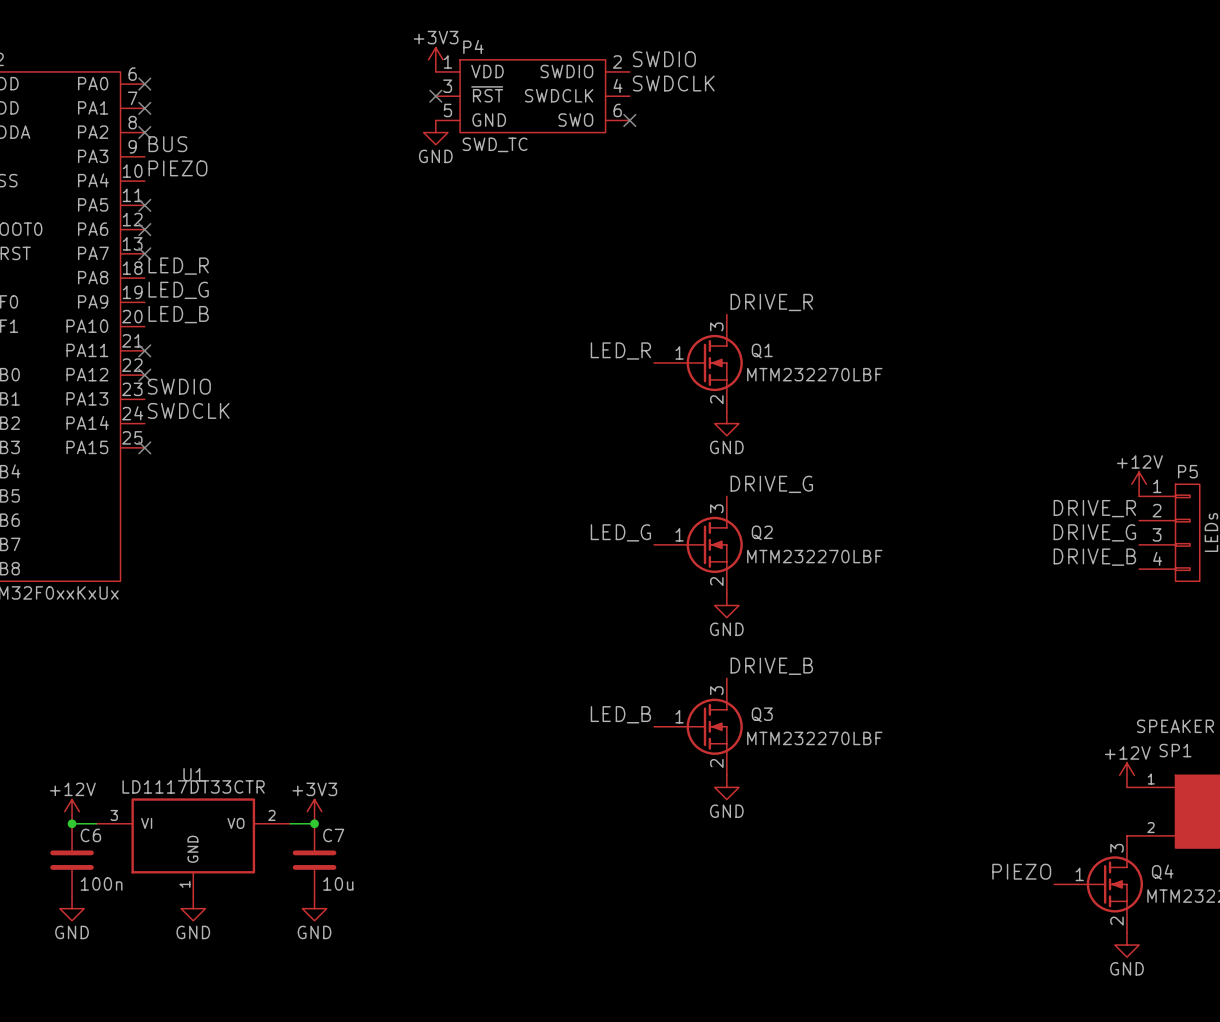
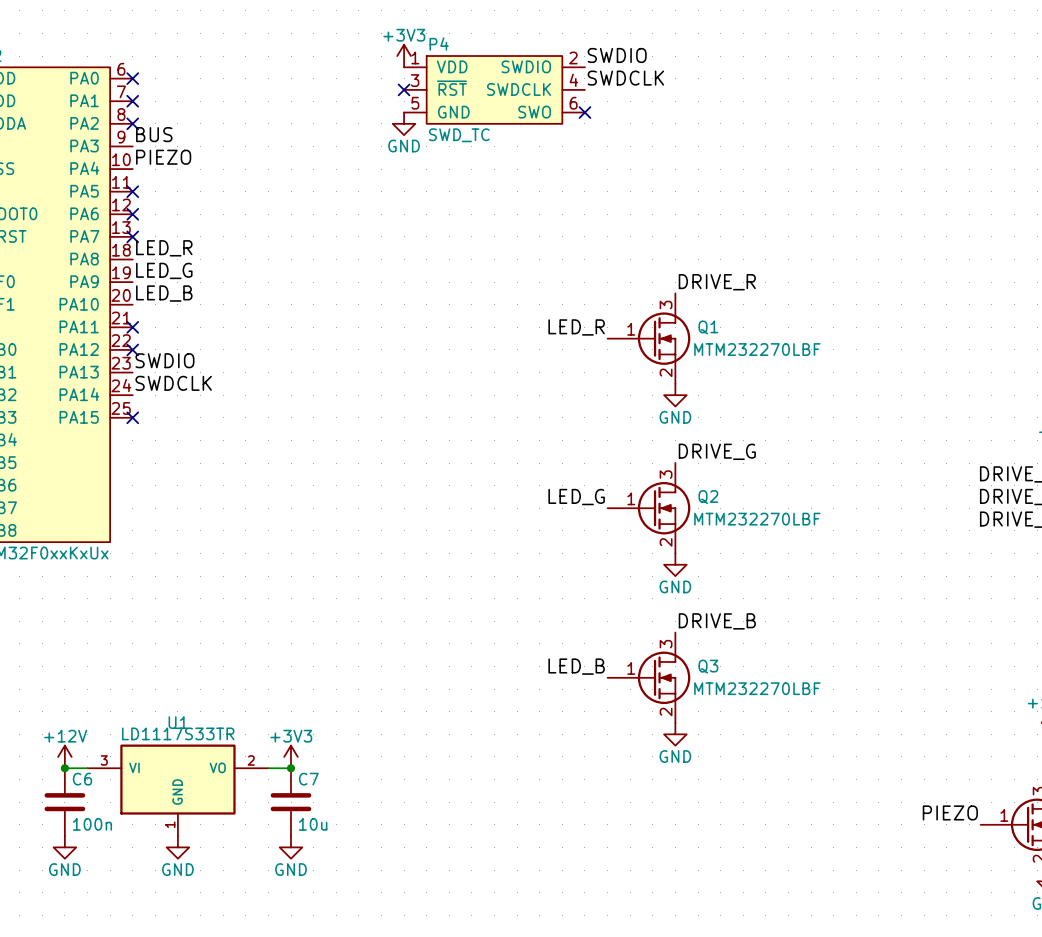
U1 value: LD1117DT33CTR (193, 786) -> LD1117S33TR (178, 733)

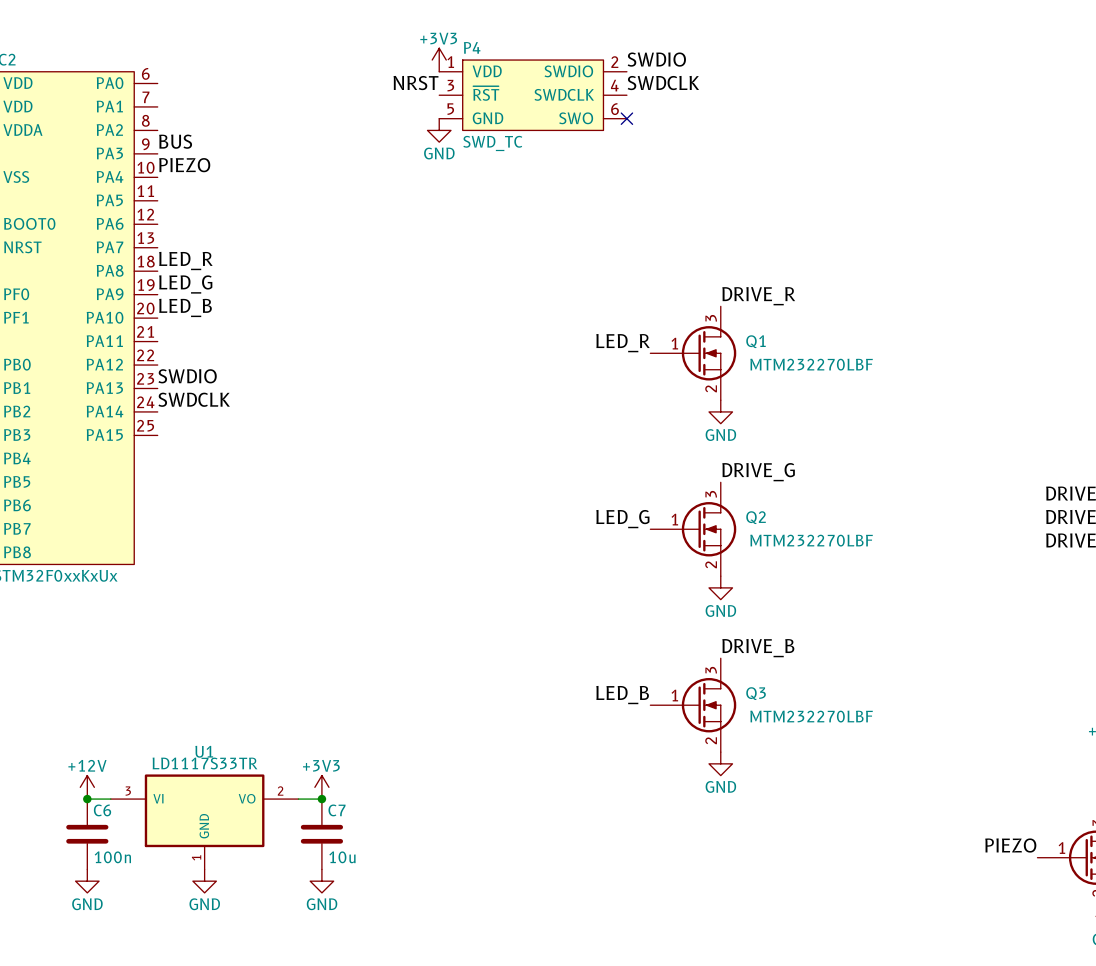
no-connect mark: (132, 78) -> none
label: none -> NRST (416, 83)
no-connect mark: (404, 89) -> none
no-connect mark: (132, 101) -> none
no-connect mark: (132, 123) -> none
no-connect mark: (132, 191) -> none
no-connect mark: (132, 214) -> none
no-connect mark: (132, 236) -> none
no-connect mark: (132, 327) -> none
no-connect mark: (132, 349) -> none
no-connect mark: (132, 417) -> none

